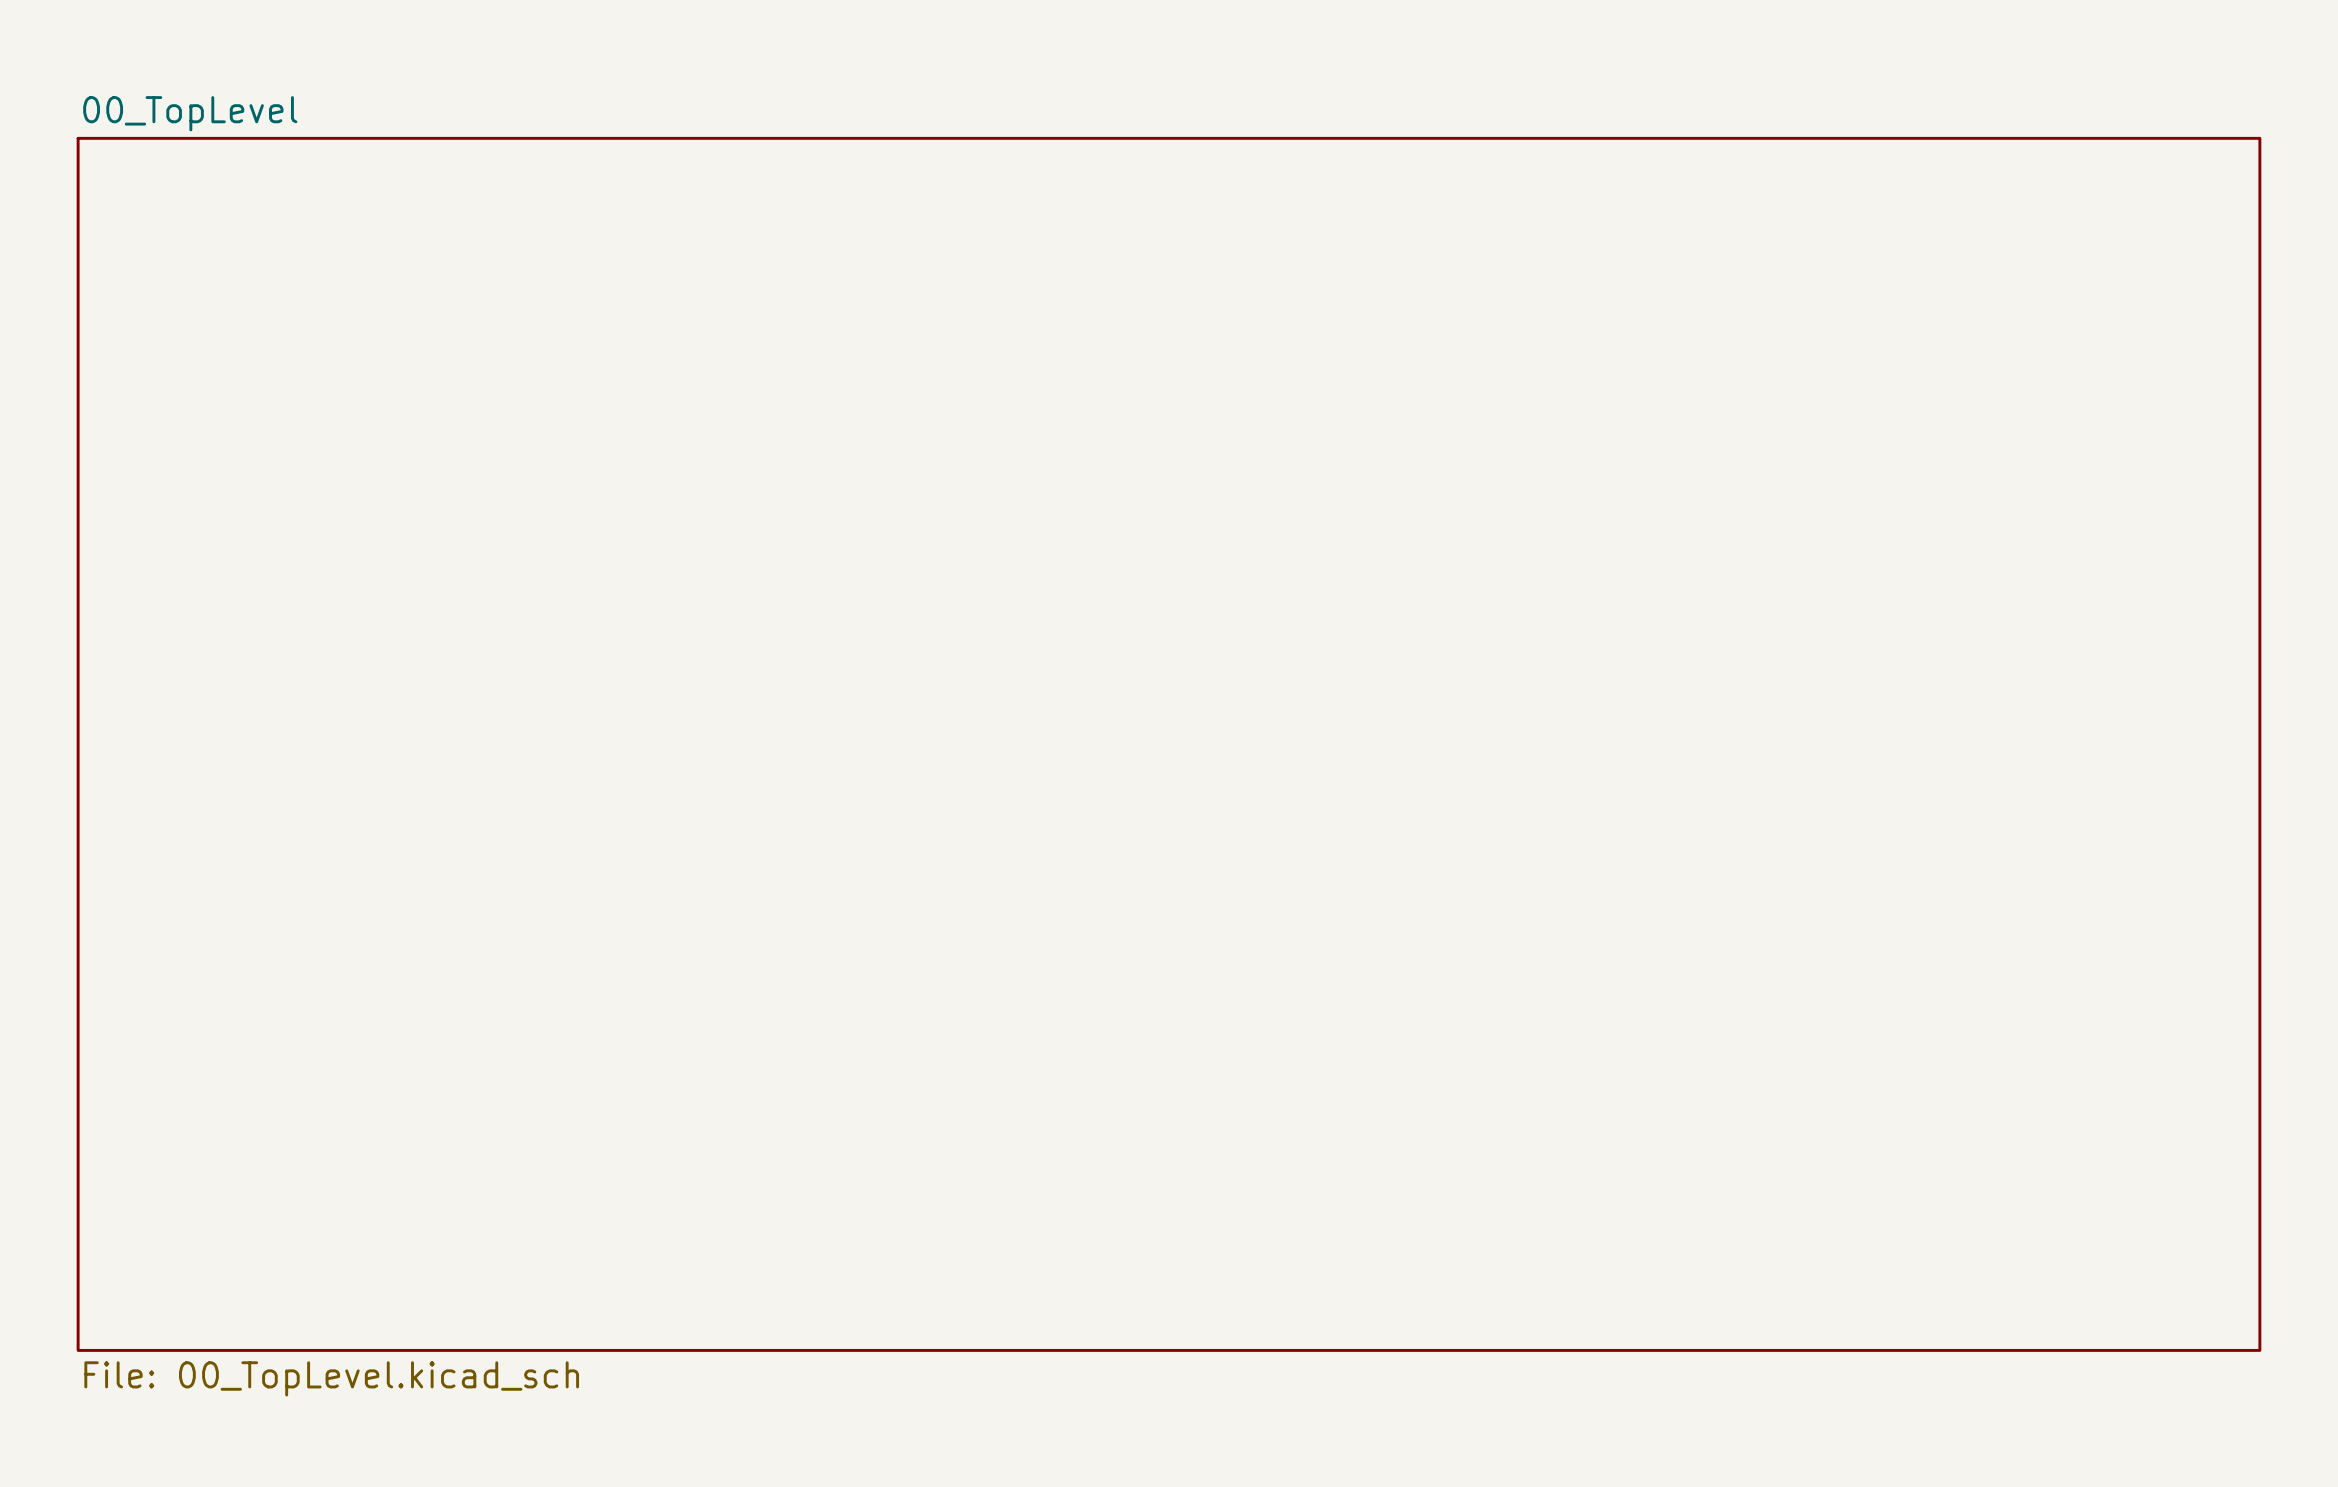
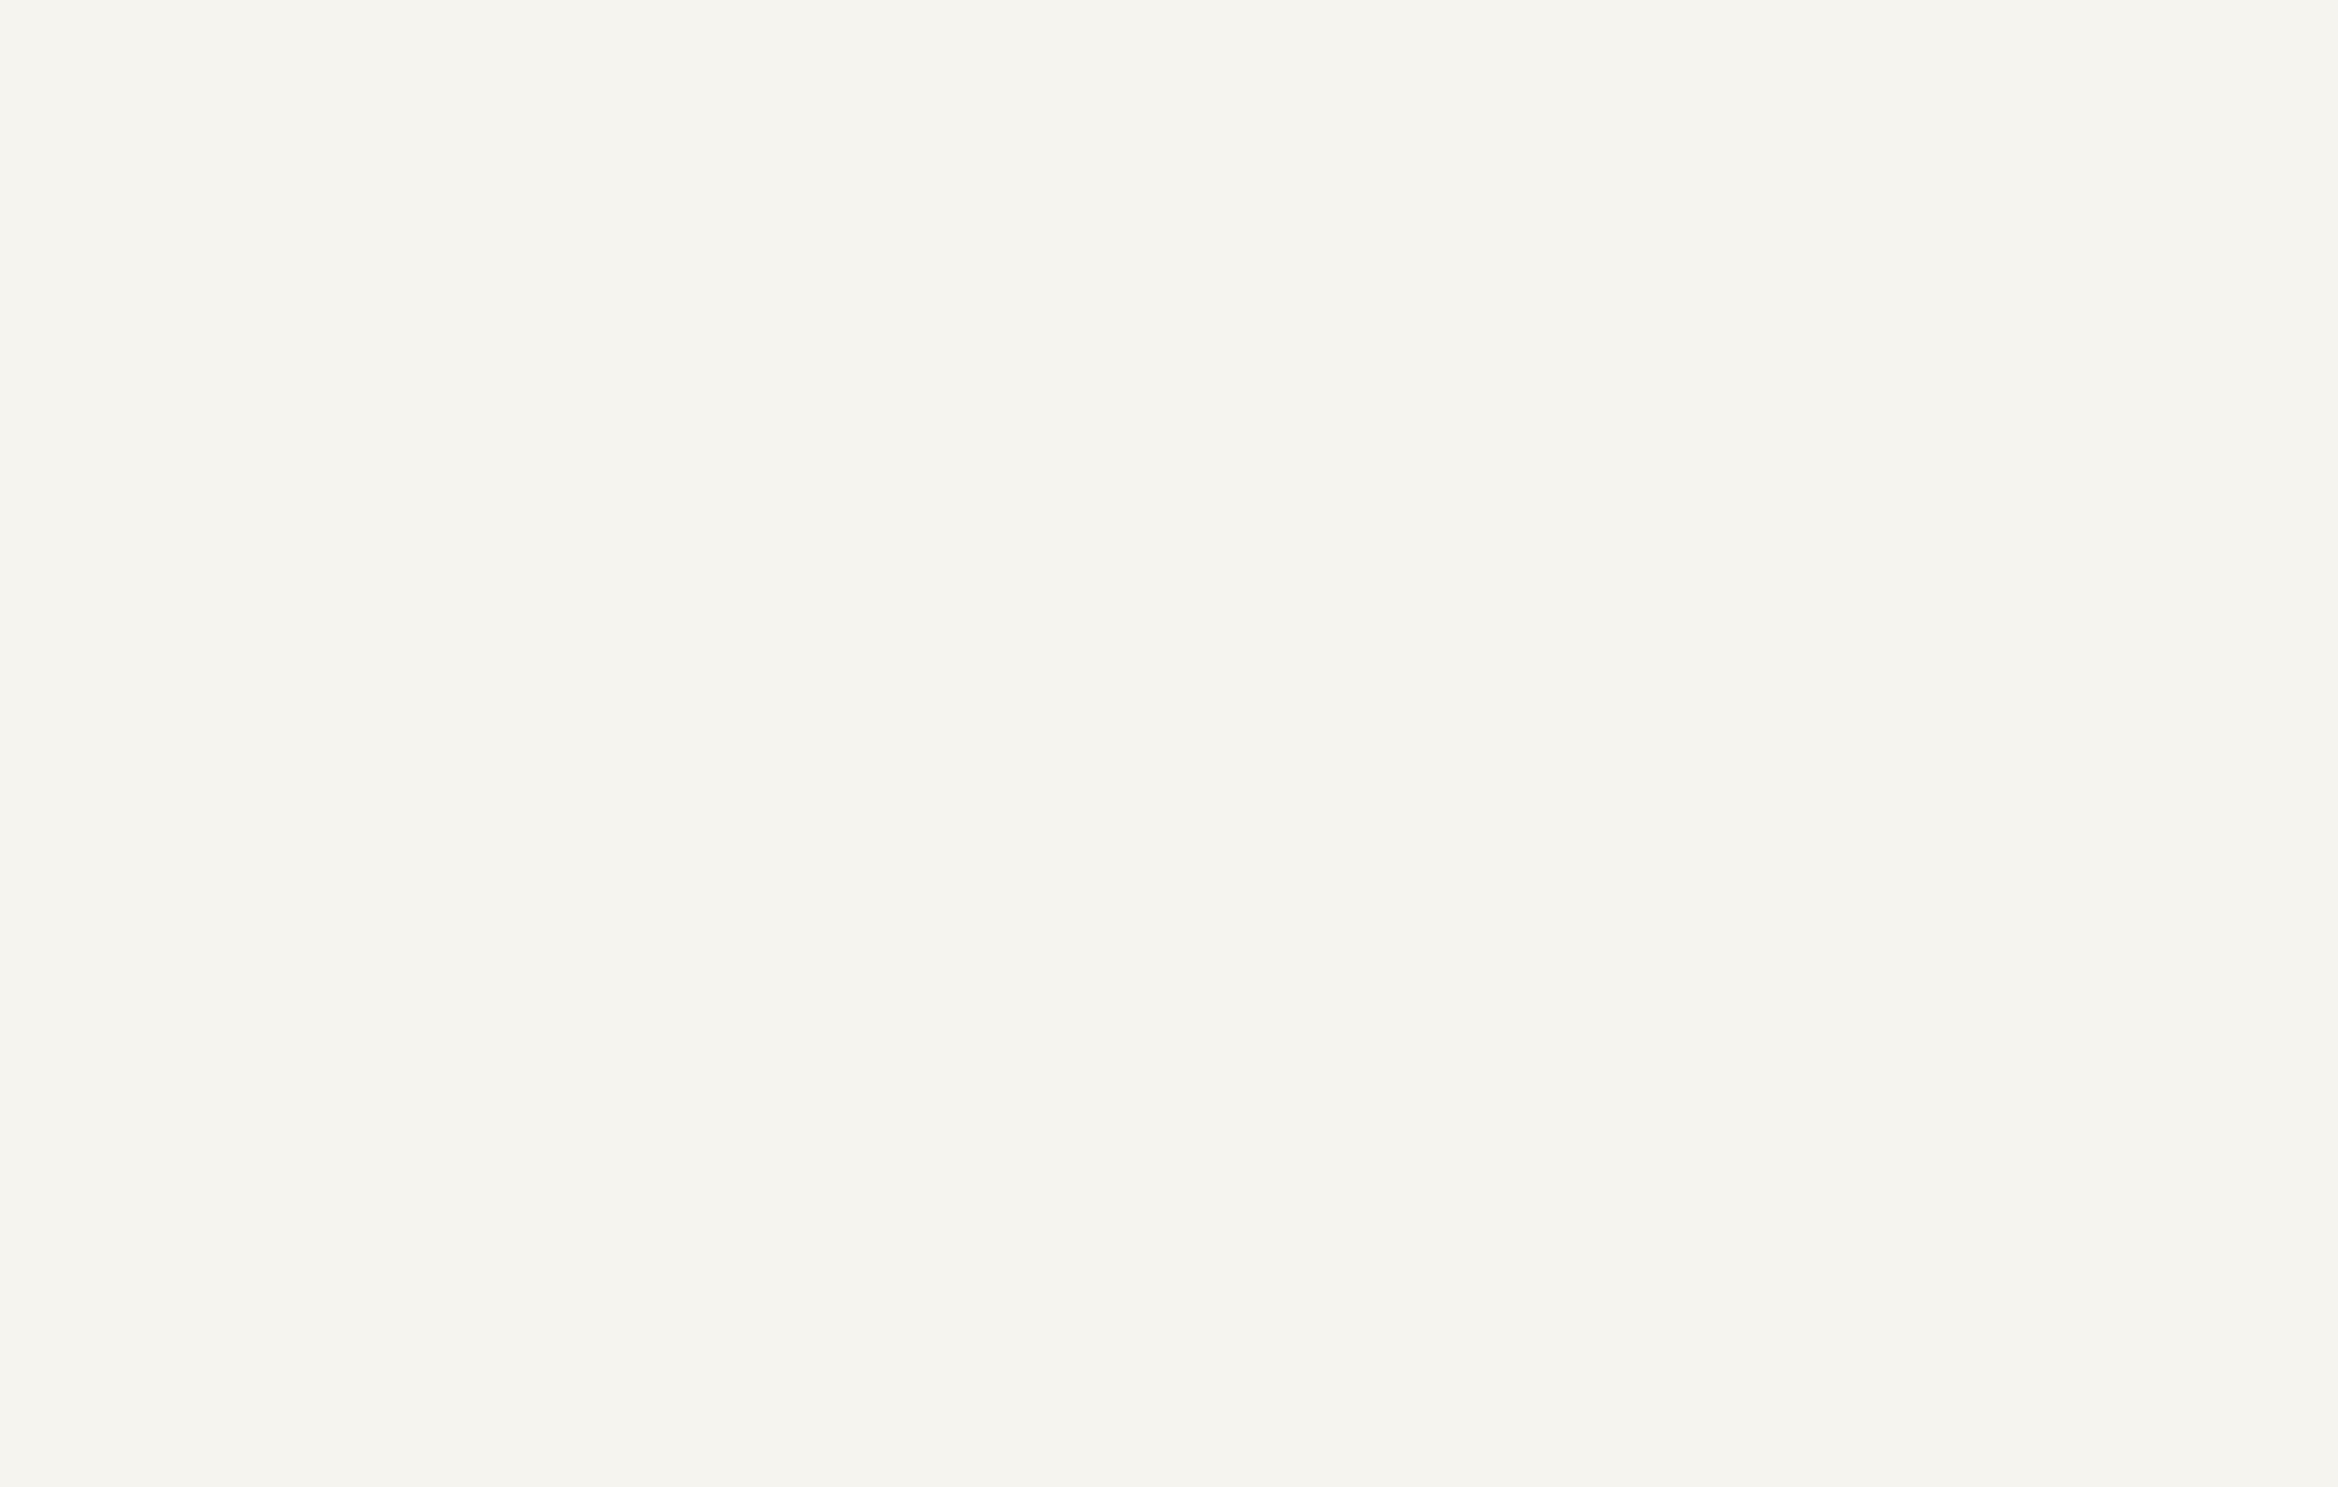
sheet 00_TopLevel: File: 00_TopLevel.kicad_sch (1168, 744) -> none

